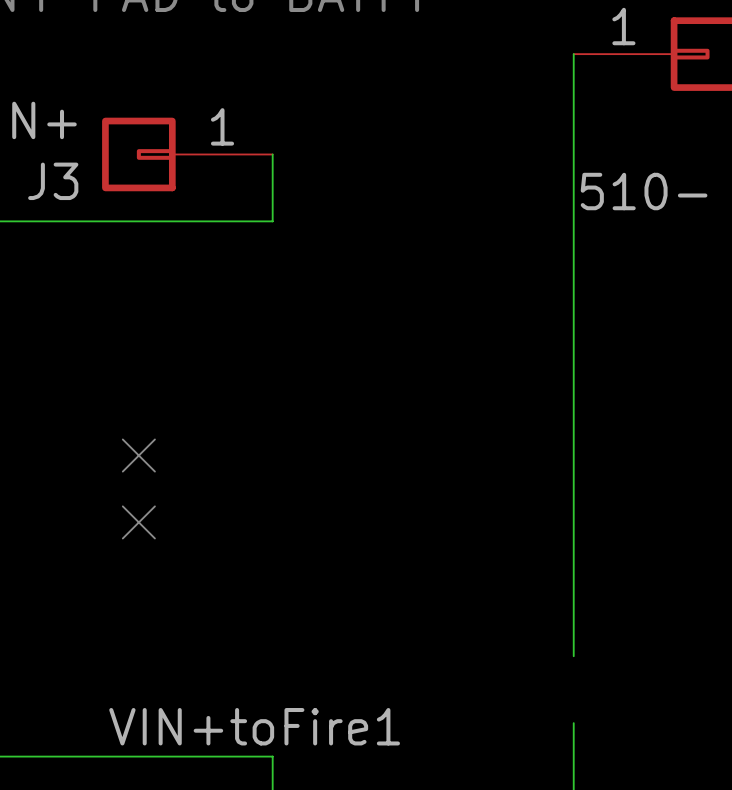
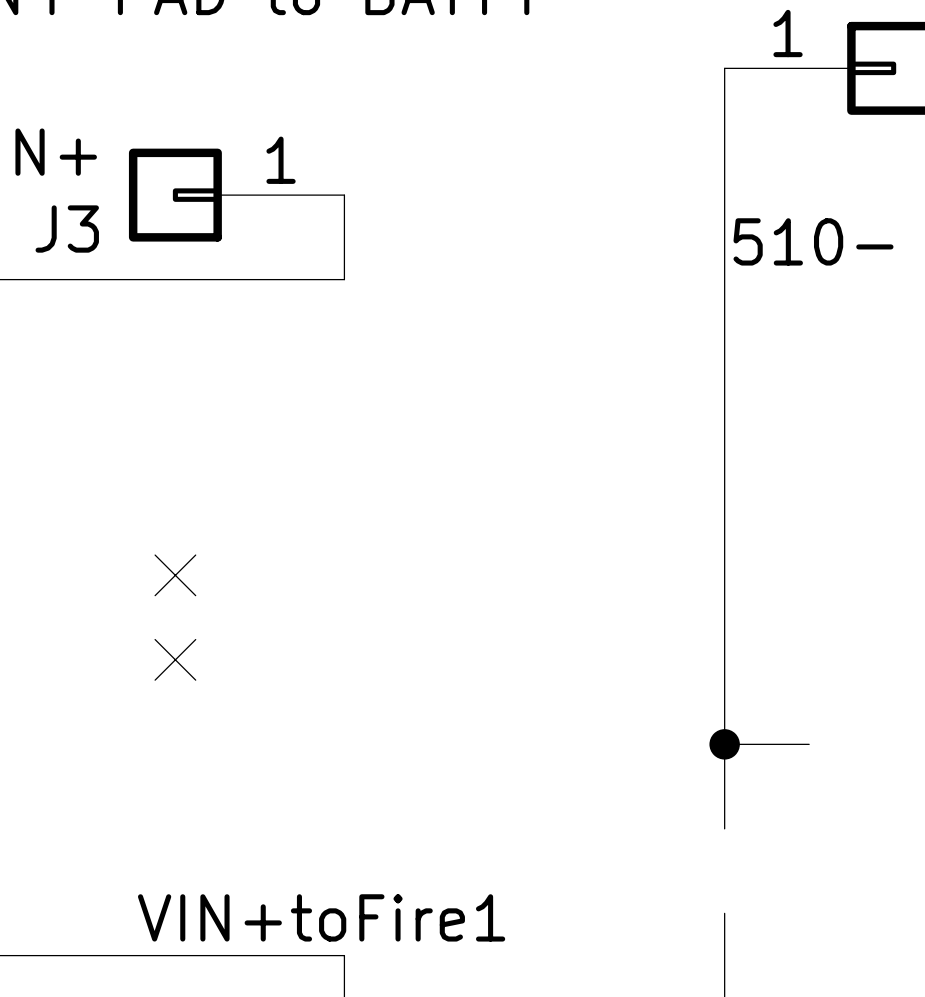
wire: none -> (724, 744) (809, 744)
junction: none -> (724, 744)

